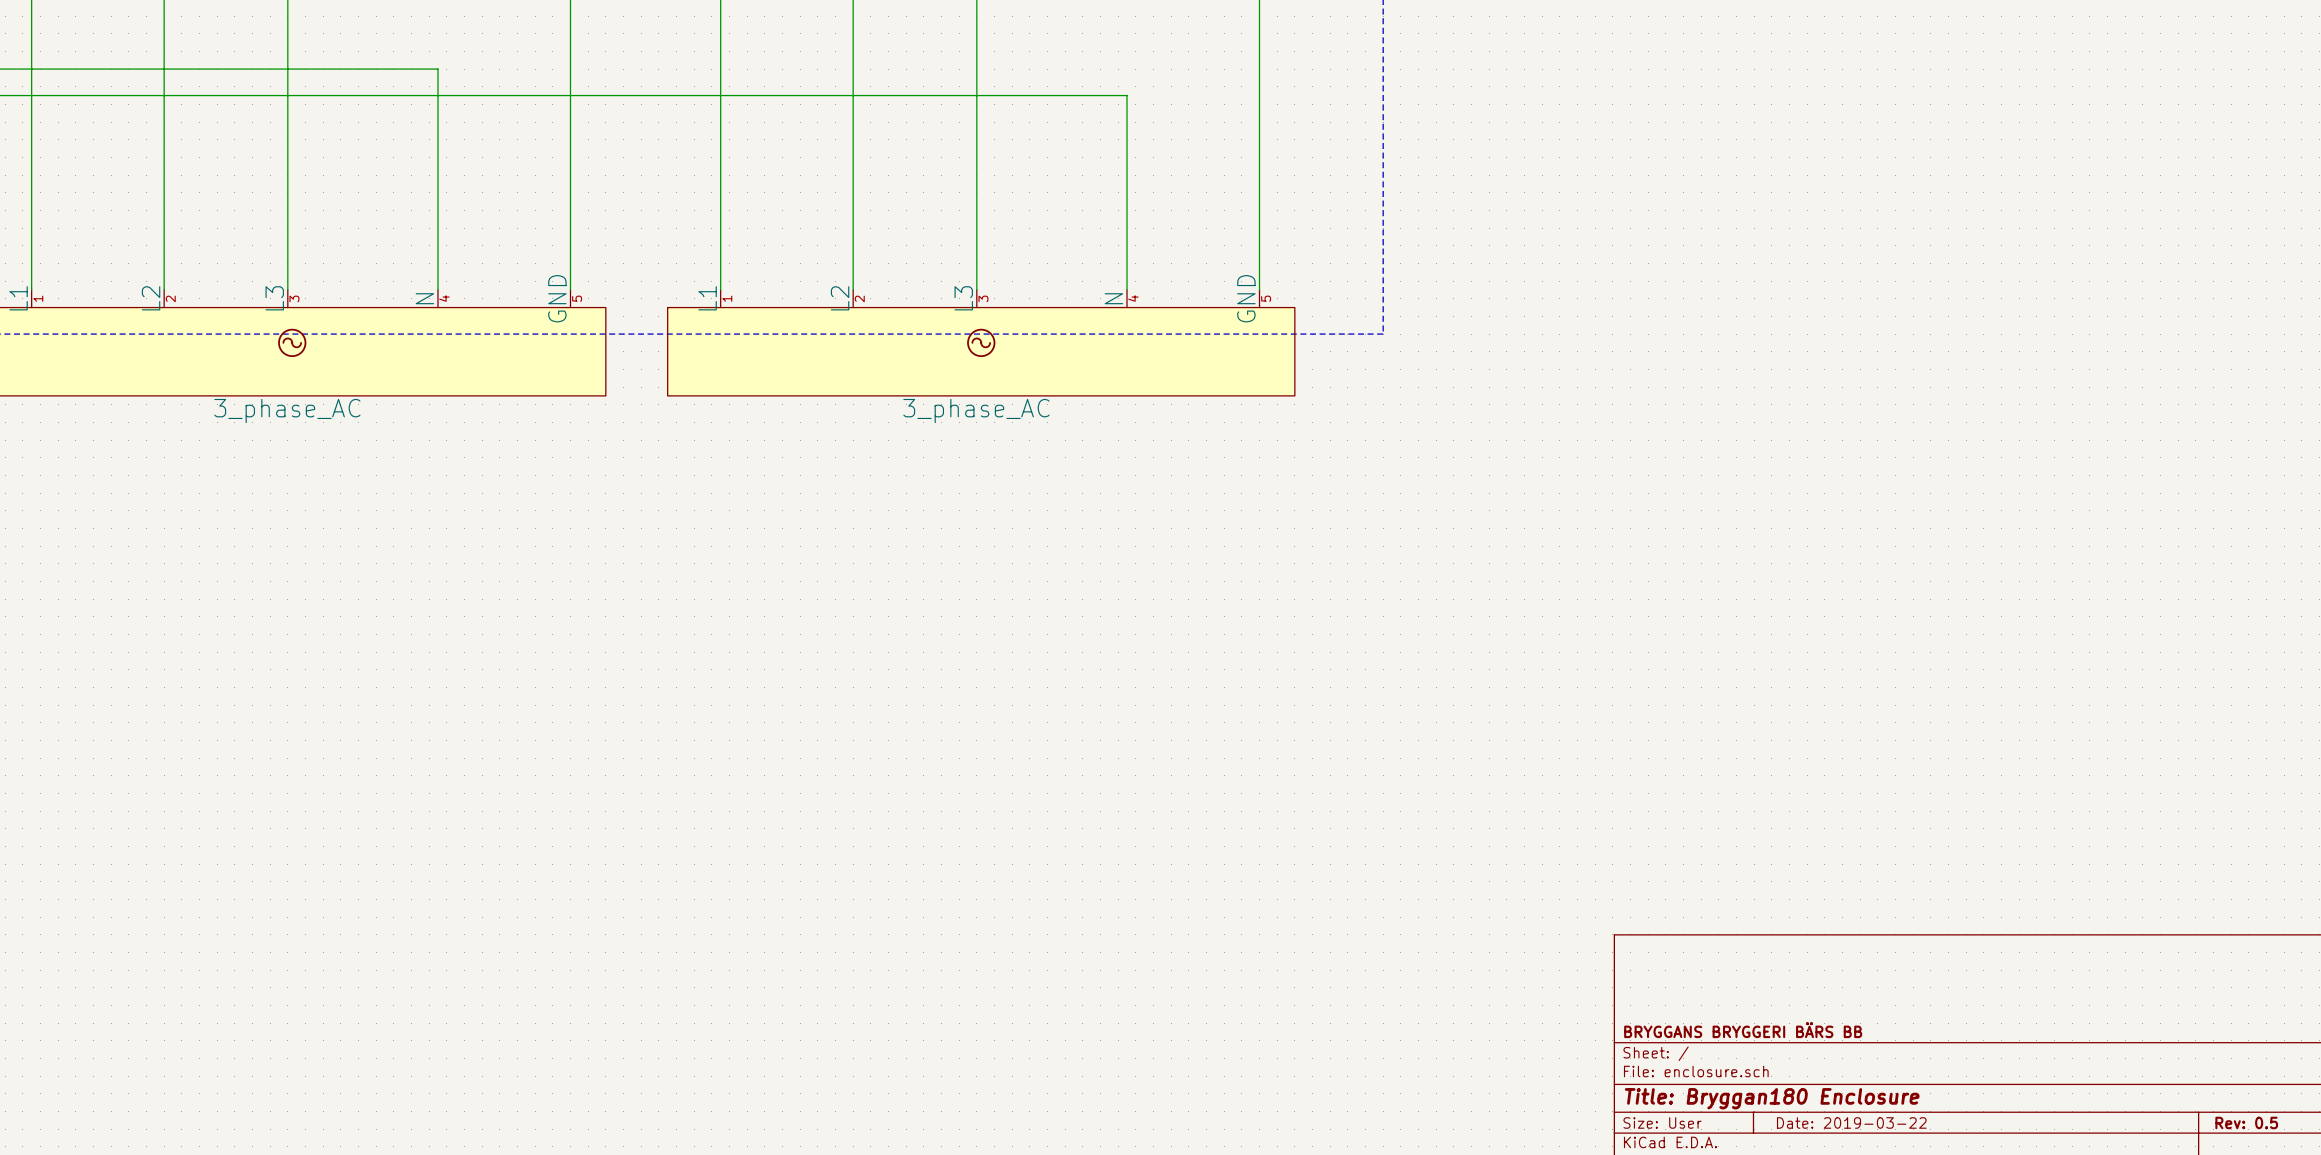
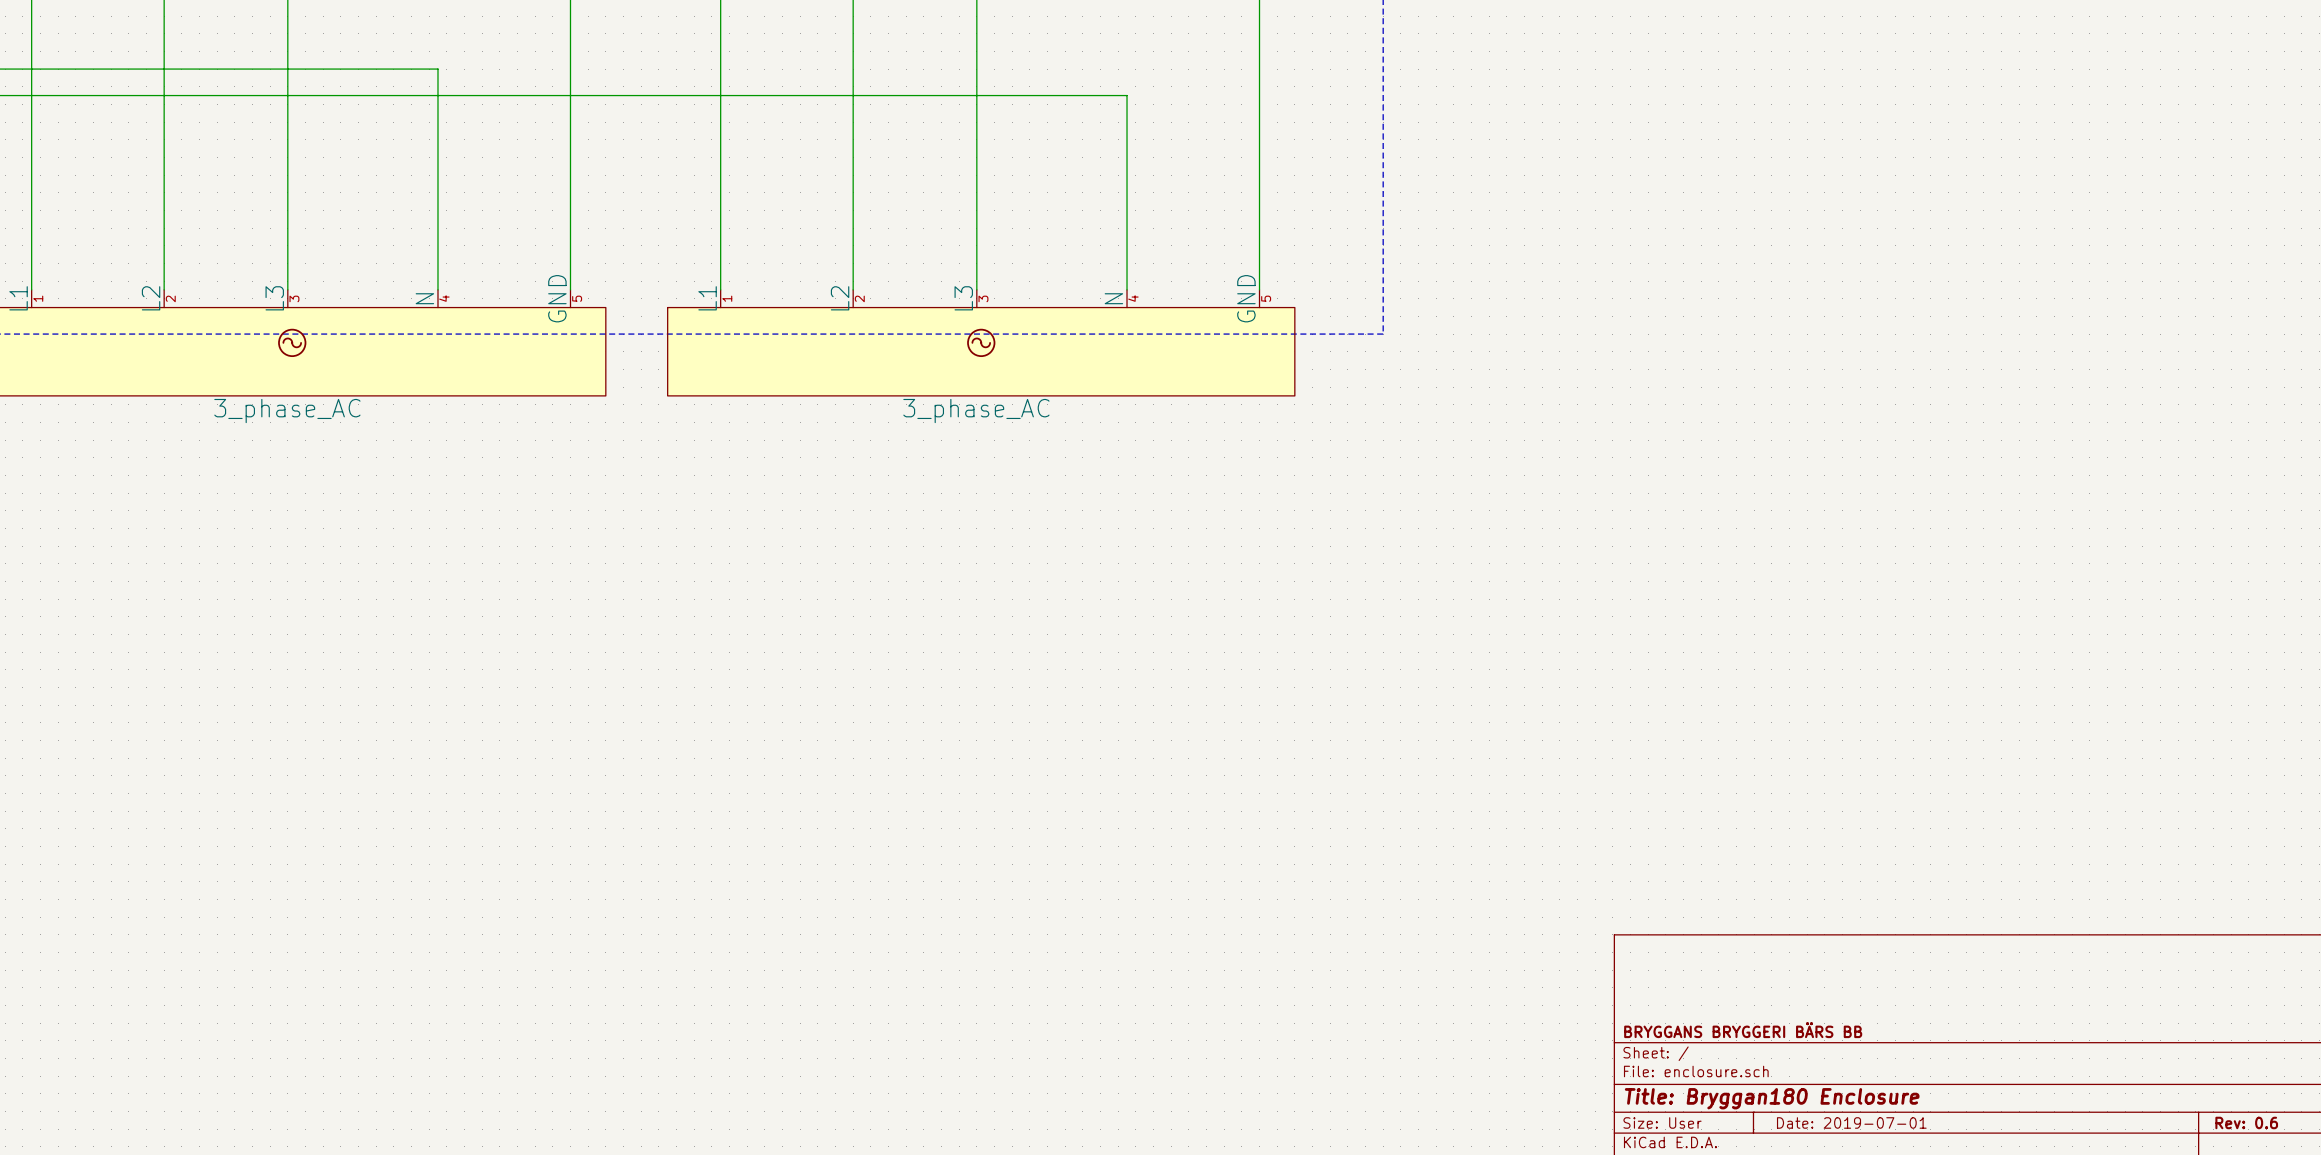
title block: Date: 2019-03-22 (1851, 1122) -> Date: 2019-07-01 (1851, 1122)
title block: Rev: 0.5 (2246, 1122) -> Rev: 0.6 (2246, 1122)

